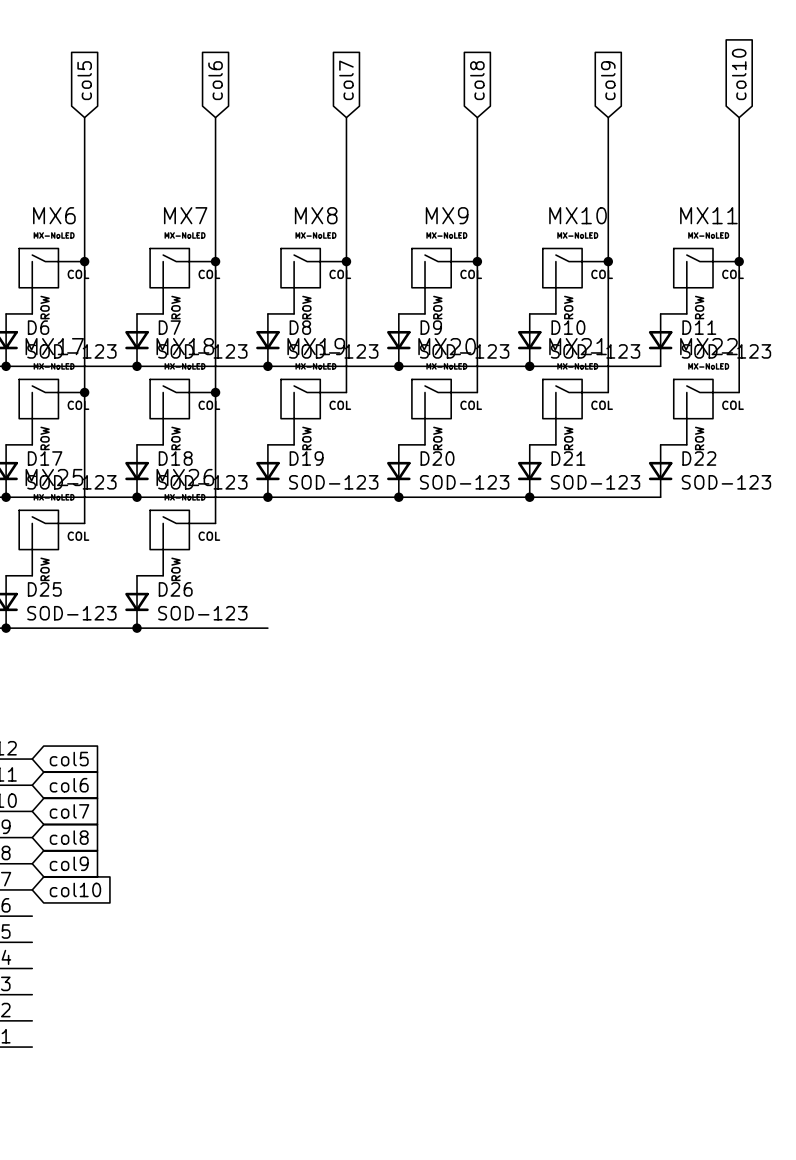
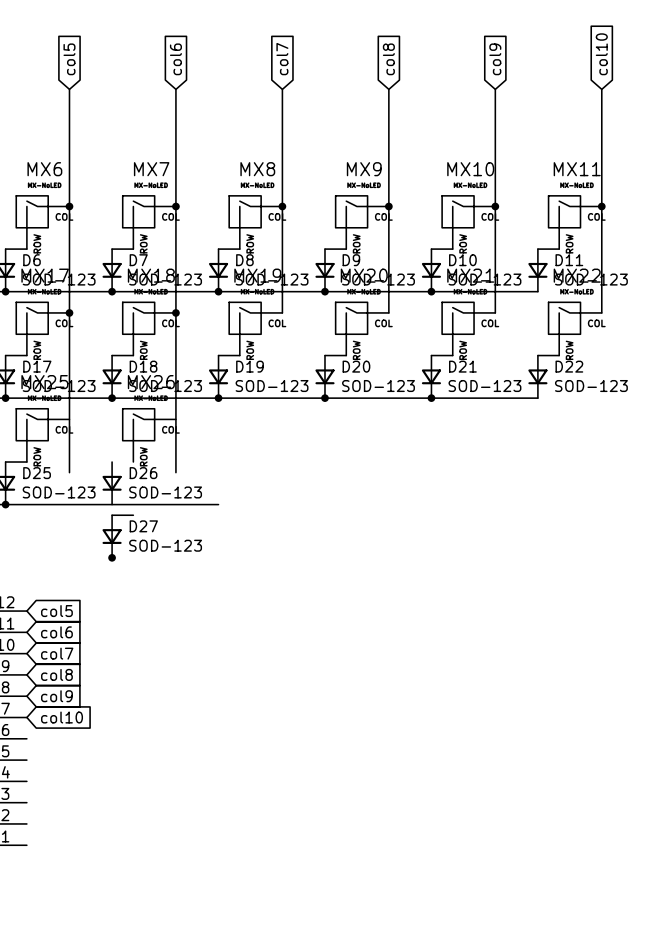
wire: none -> (69, 419) (69, 472)
wire: none -> (175, 419) (175, 472)
wire: (137, 575) (163, 575) -> (112, 515) (133, 515)
junction: (137, 628) -> none
D27: none -> SOD-123 (112, 536)
junction: none -> (112, 557)

